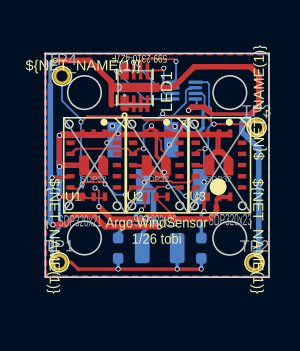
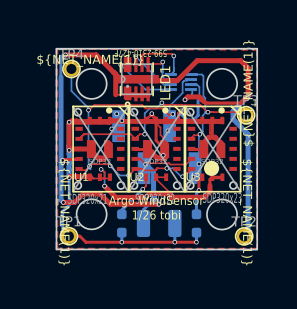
top track: (202, 66) (194, 66) (173, 87) (134, 87) -> (197, 60) (177, 80) (122, 80) (115, 74)

